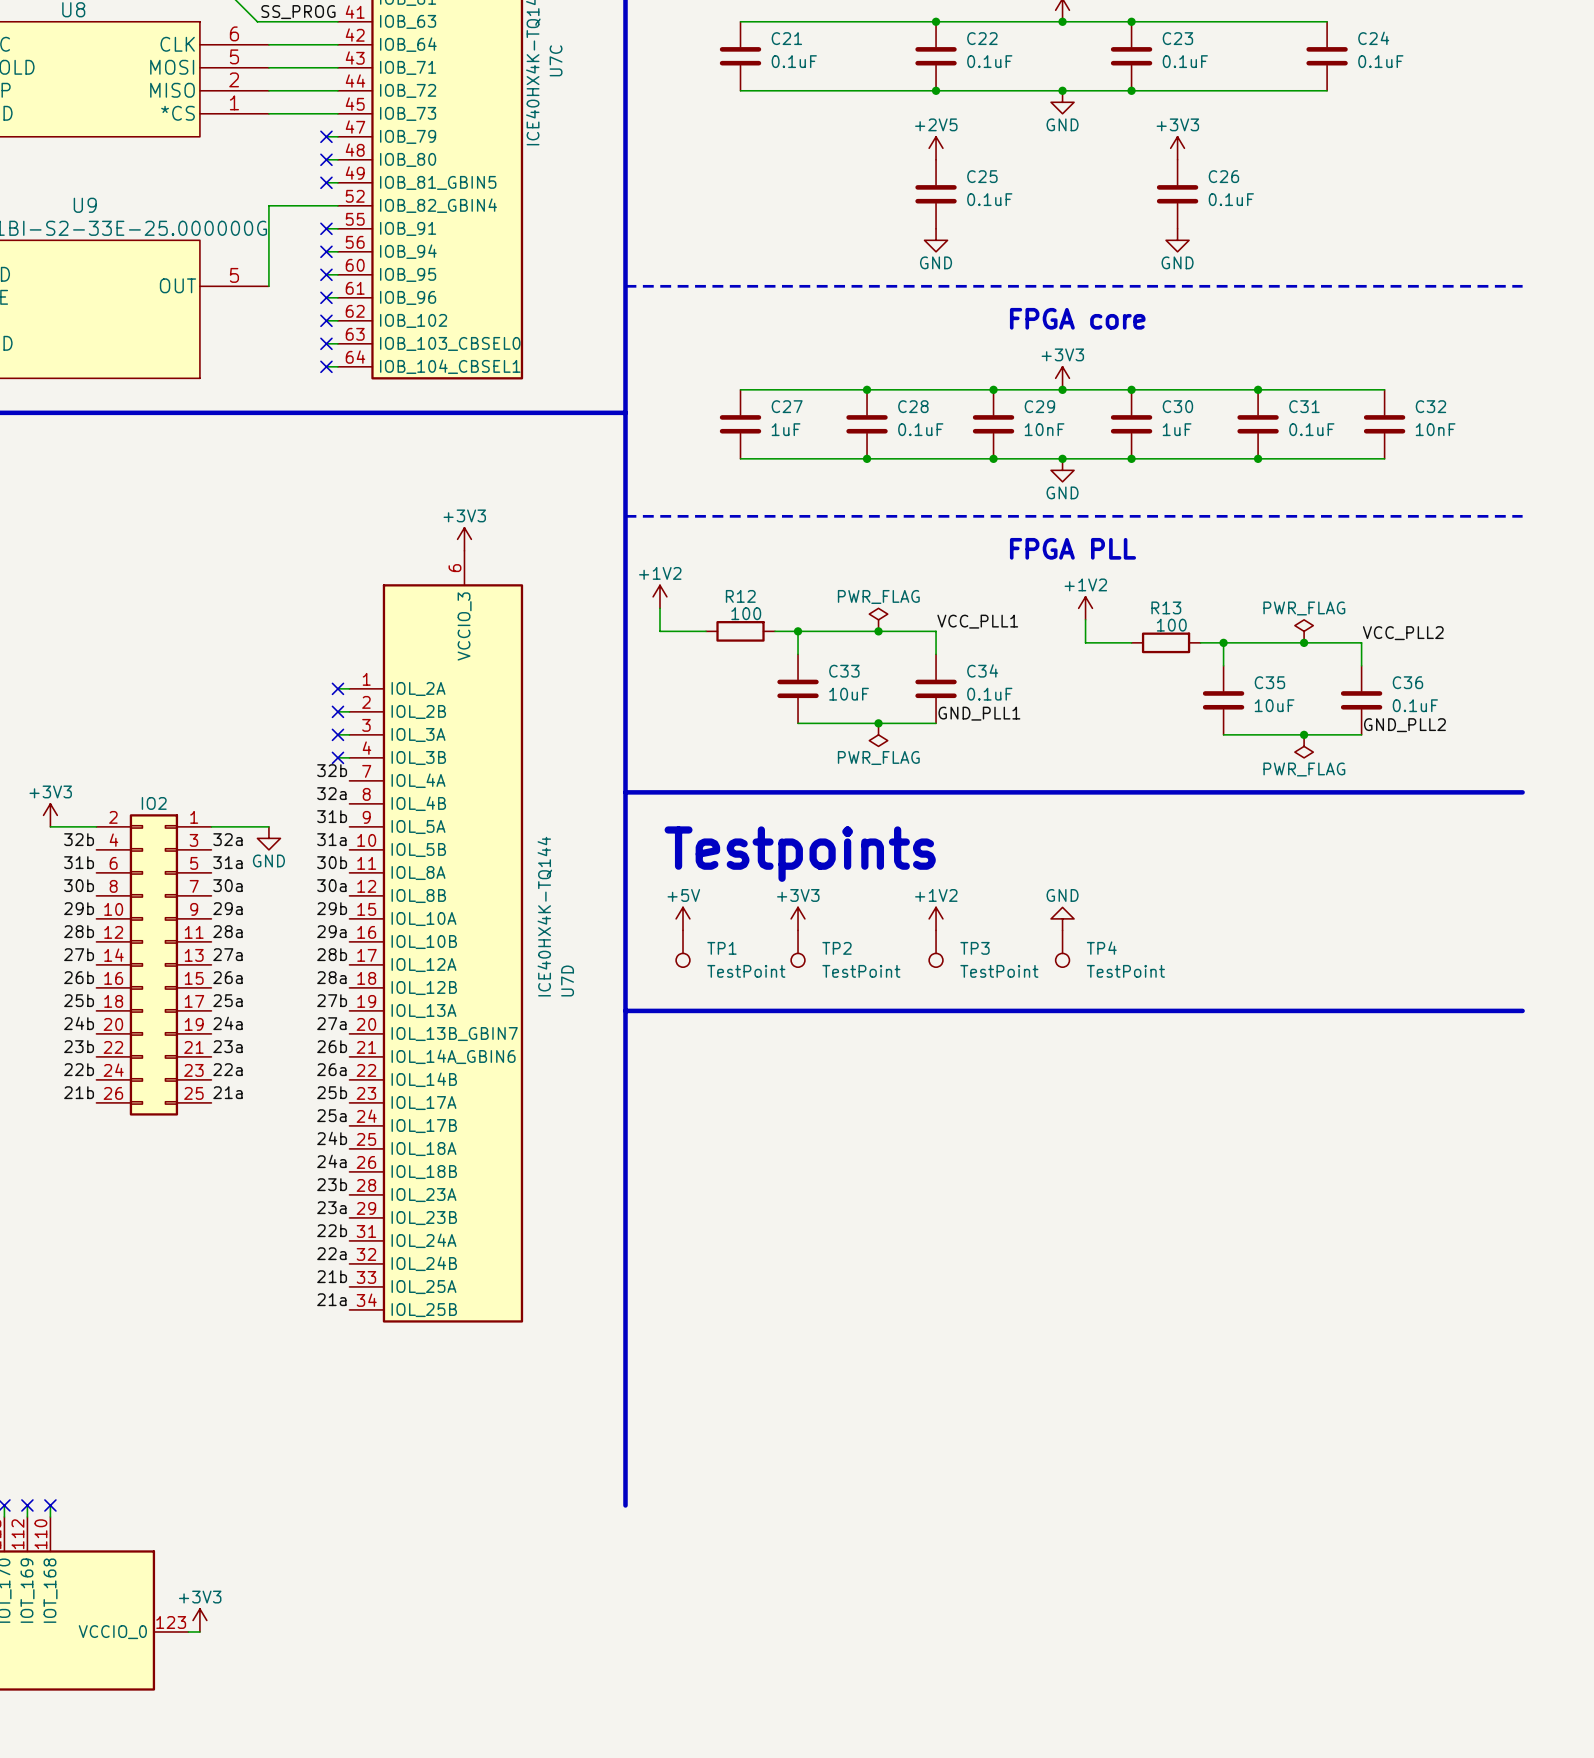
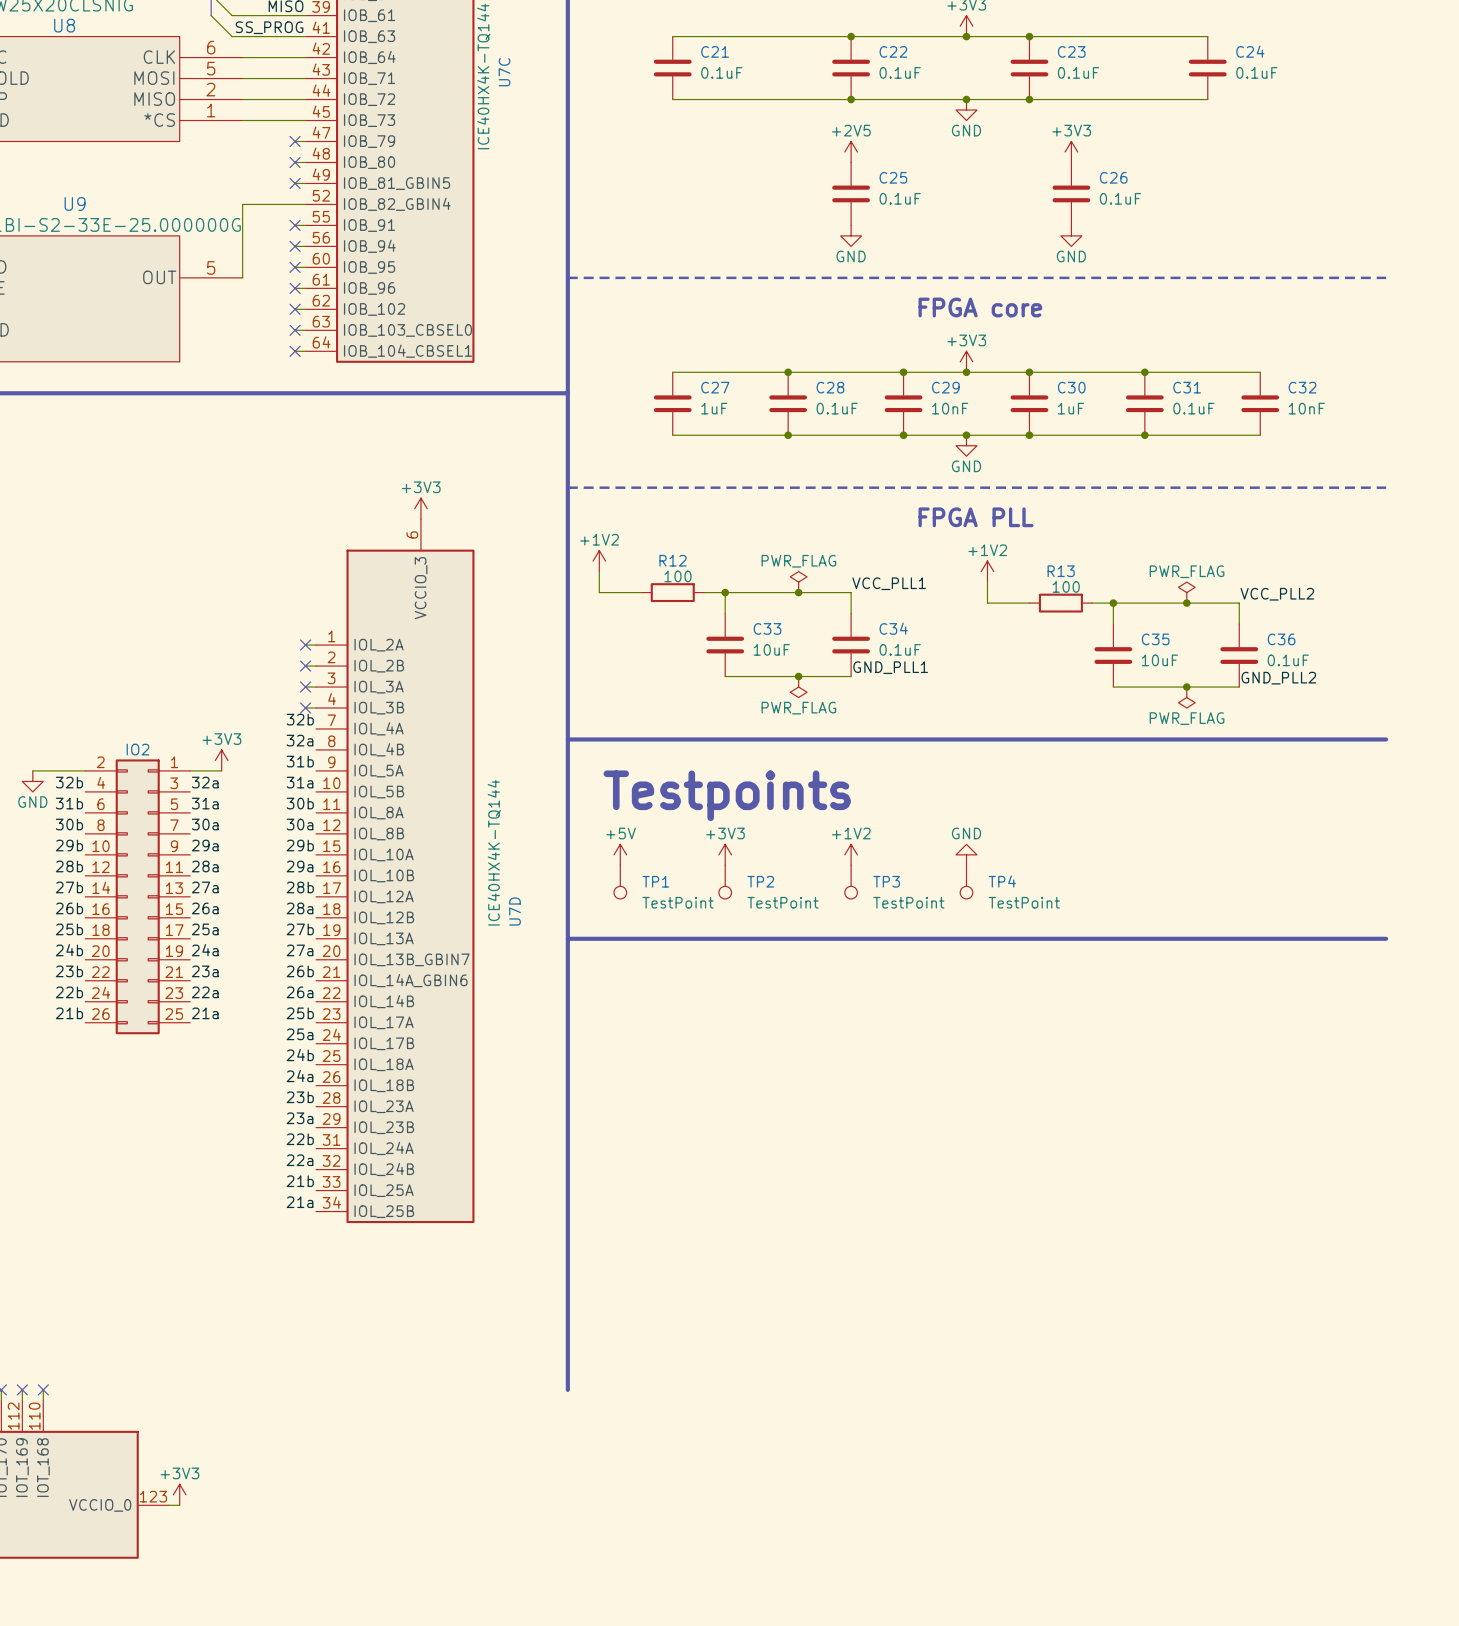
power symbol position: +3V3 (50, 815) -> +3V3 (221, 760)
wire: none -> (32, 770) (43, 770)
wire: (245, 826) (268, 826) -> none
power symbol: none -> GND (32, 781)
power symbol: GND (268, 838) -> none

